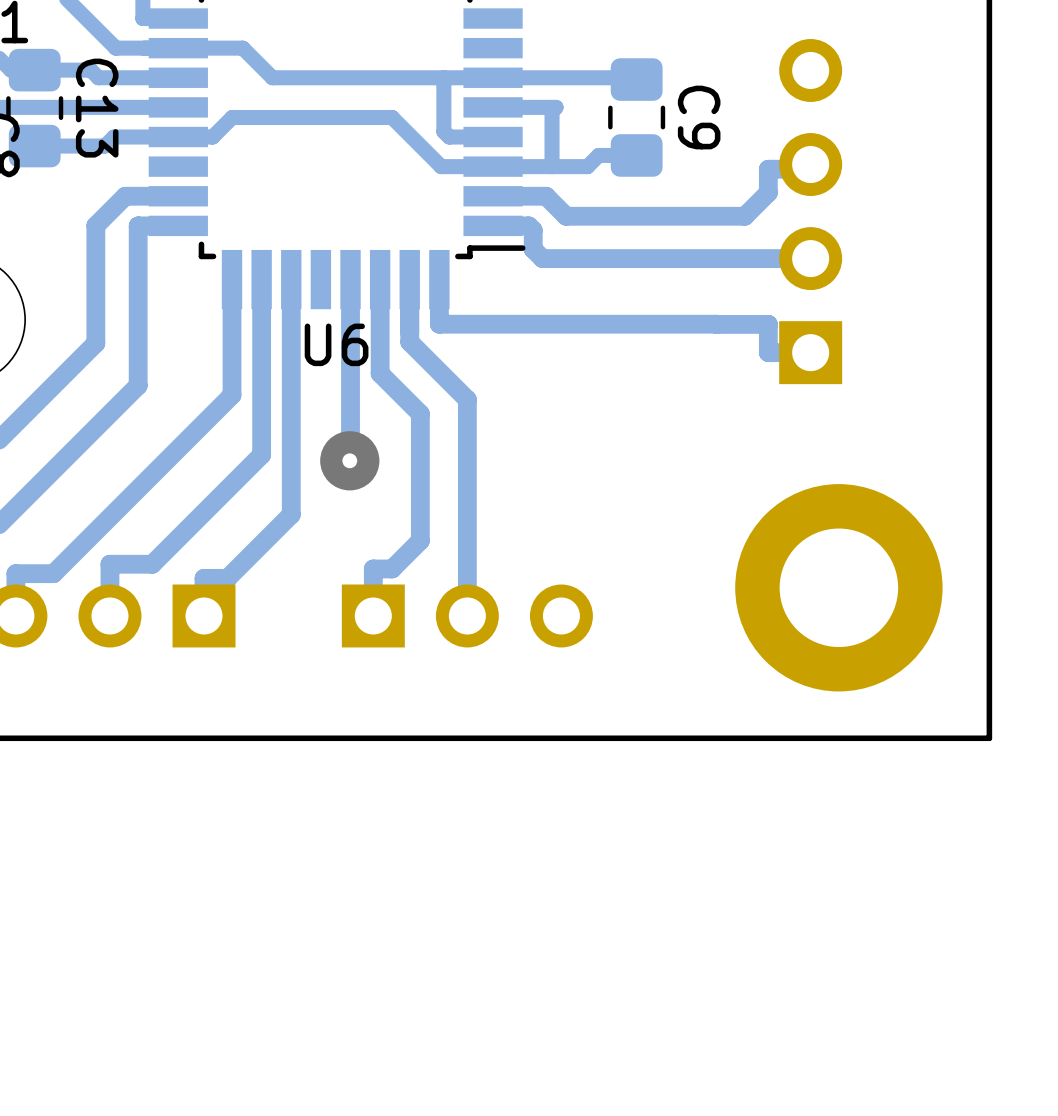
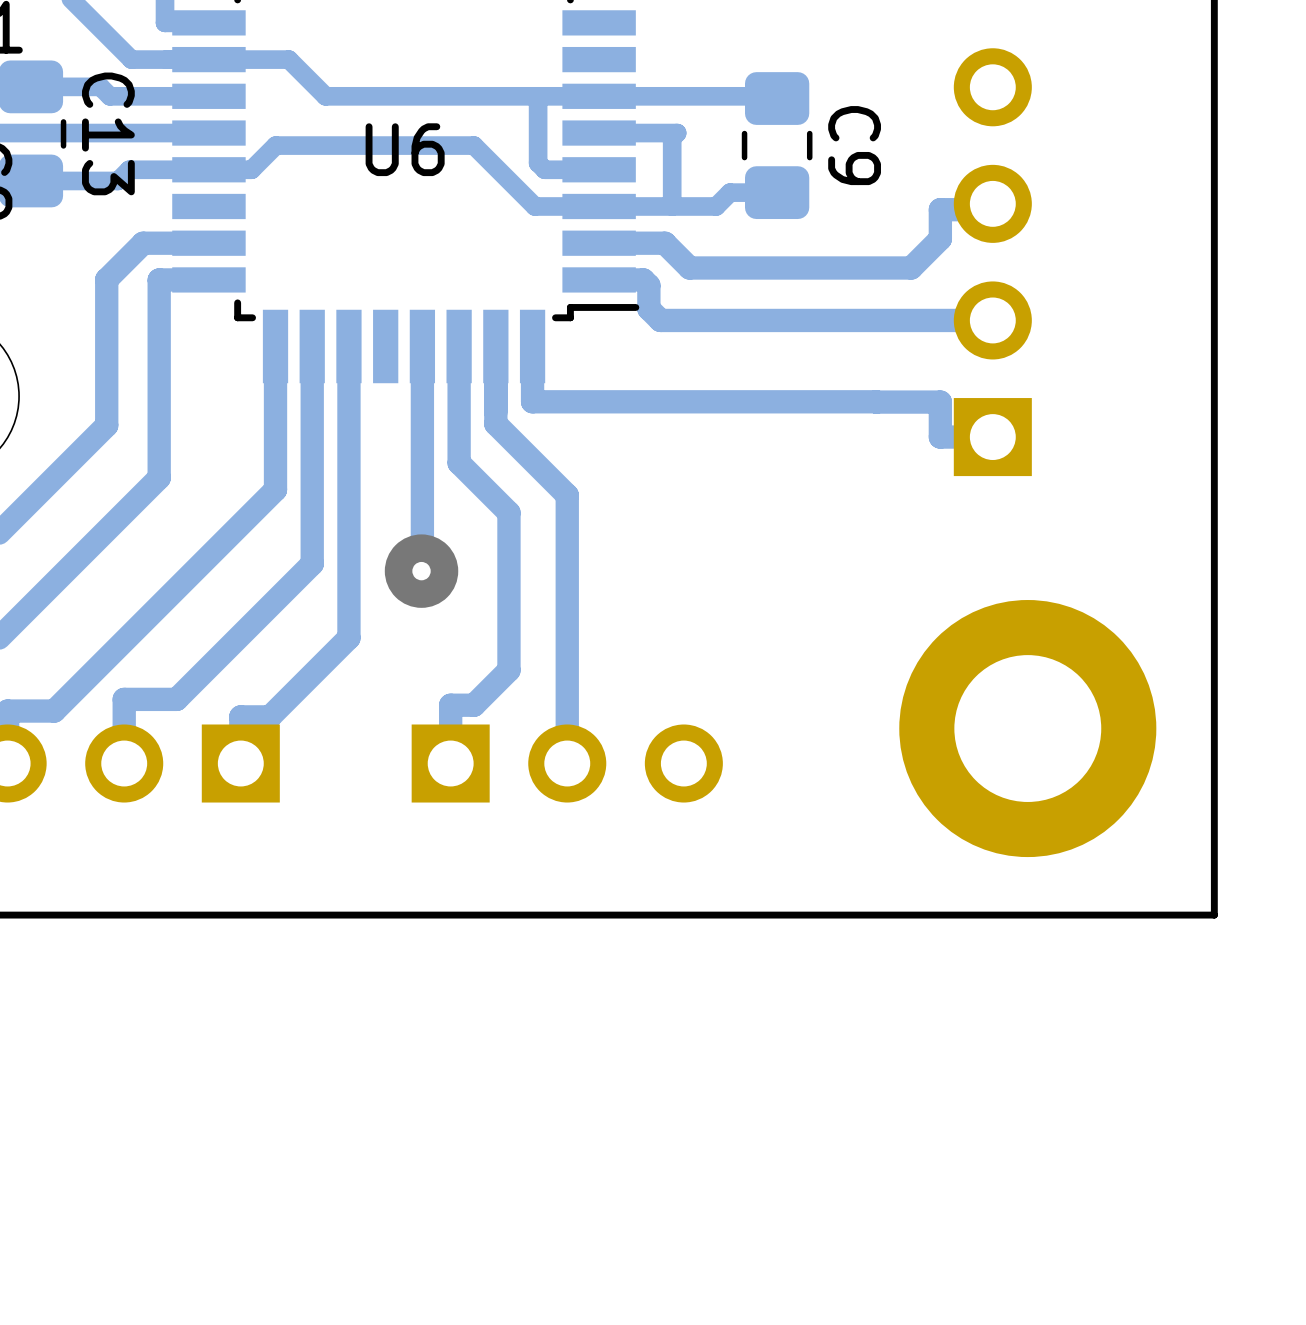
U6 name position: U6 (336, 344) -> U6 (405, 149)

